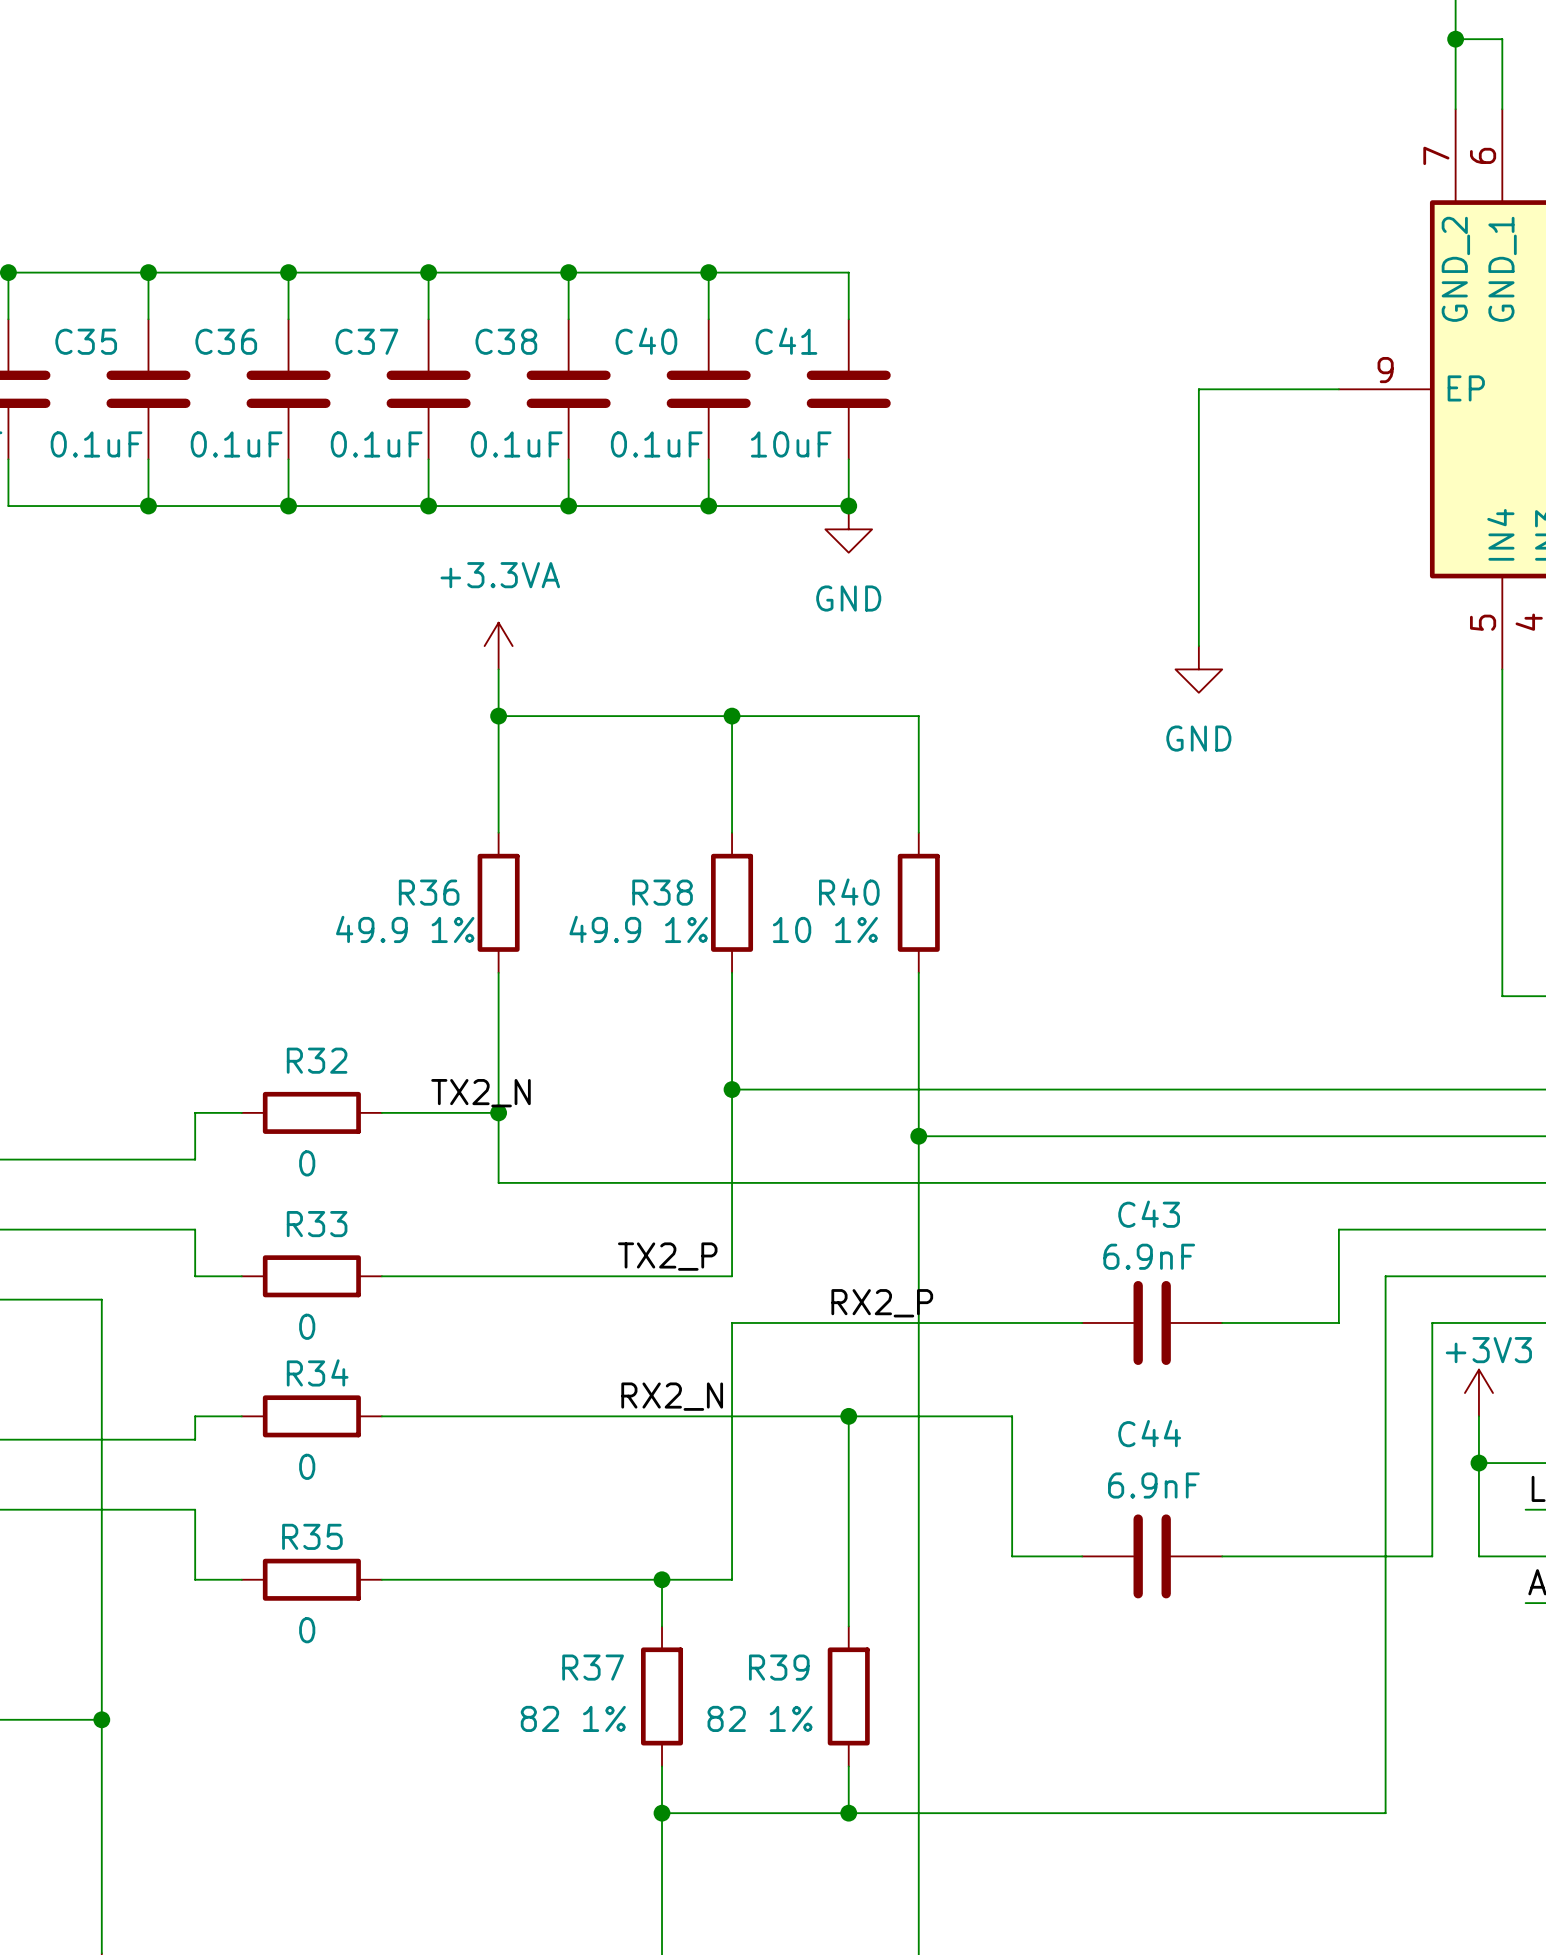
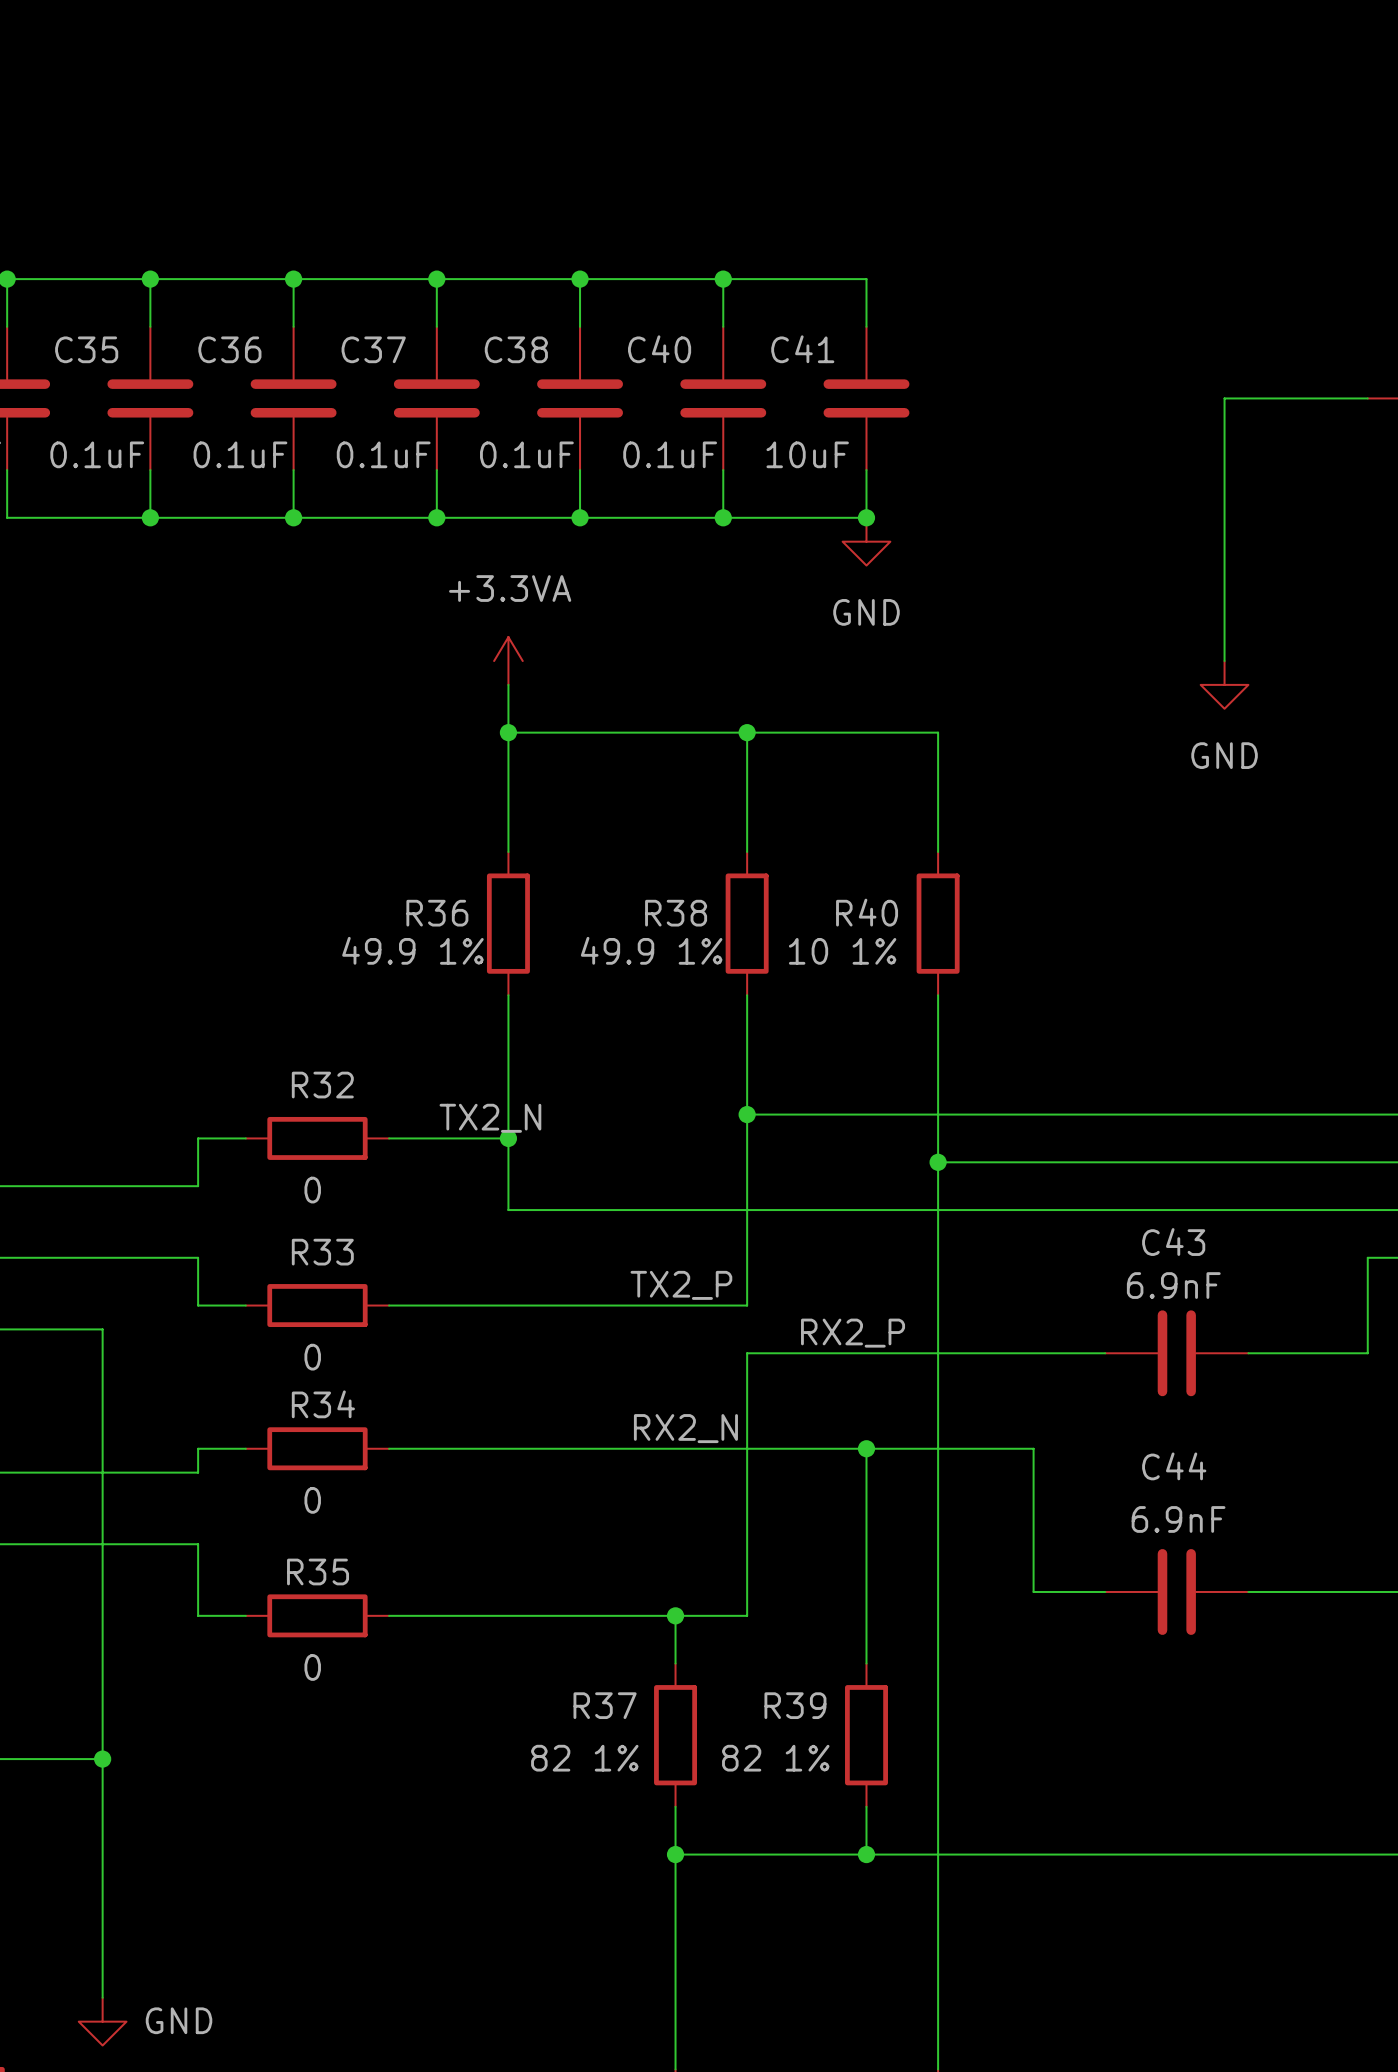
label position: RX2_P (882, 1303) -> RX2_P (853, 1333)

